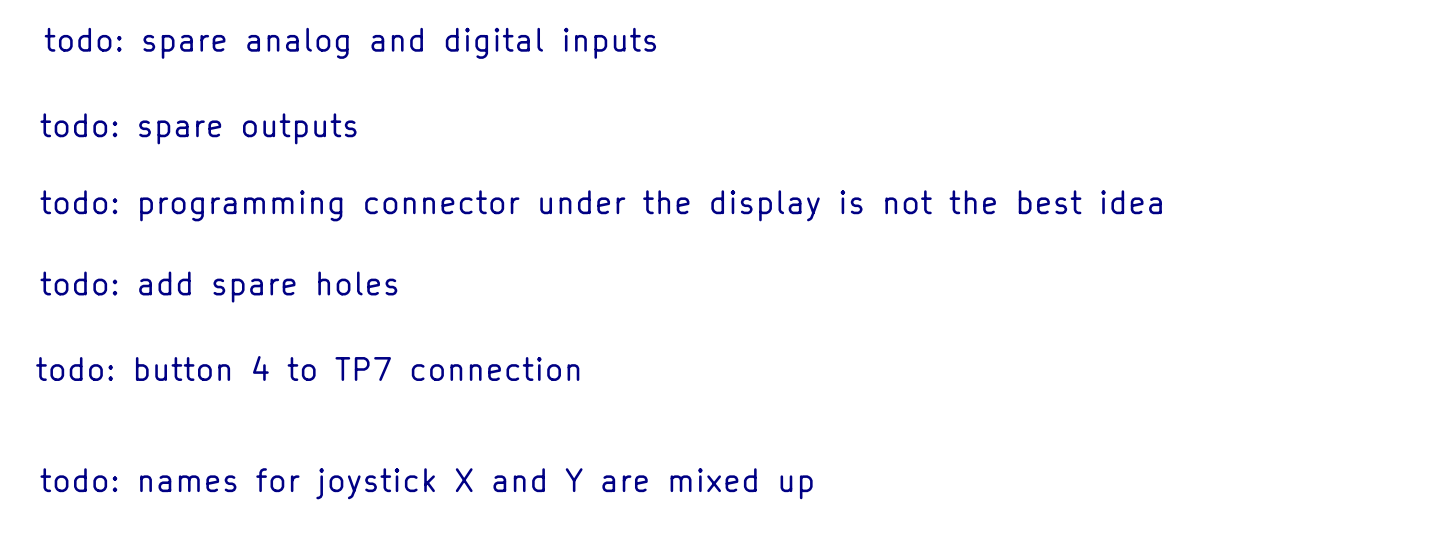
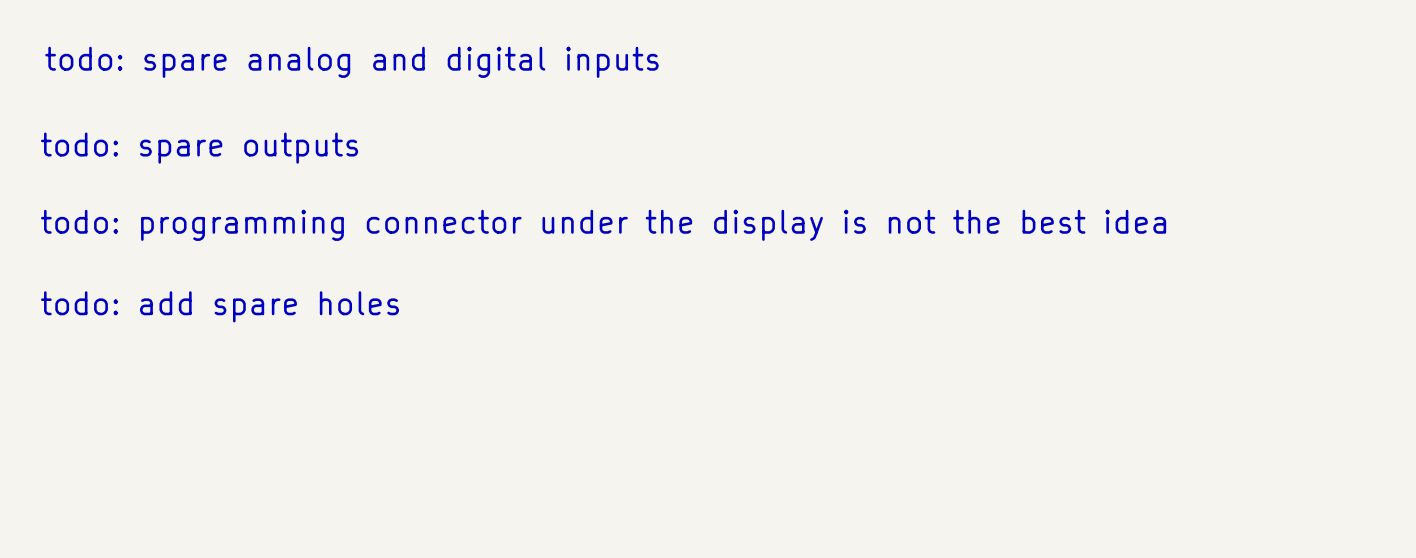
text: todo: button 4 to TP7 connection (307, 368) -> none
text: todo: names for joystick X and Y are mixed up (426, 483) -> none

